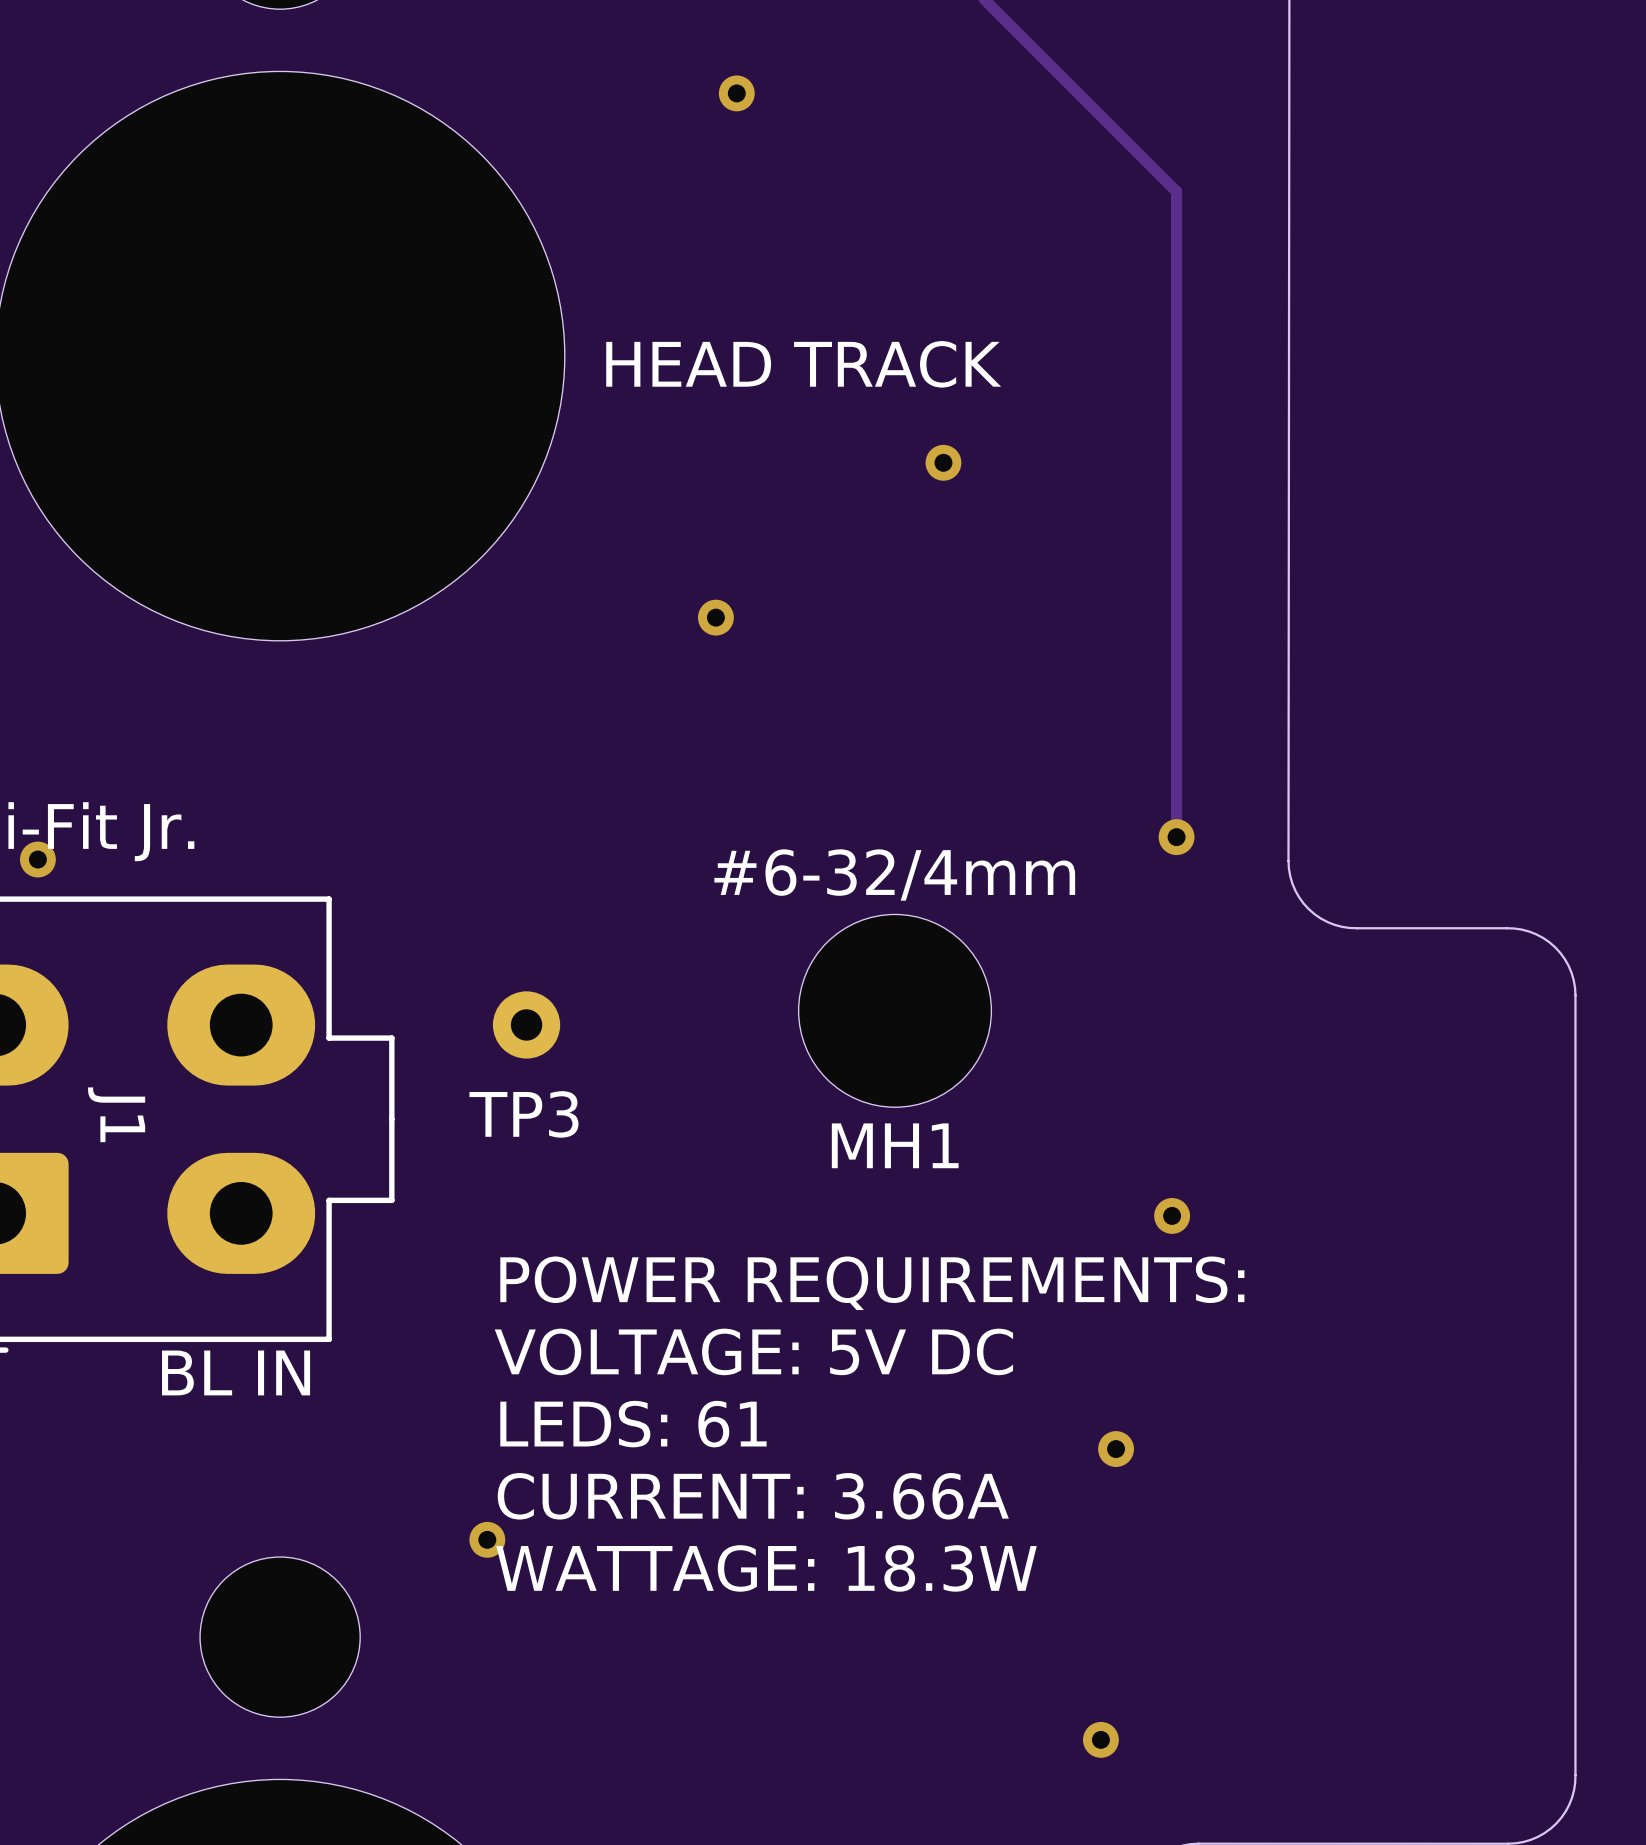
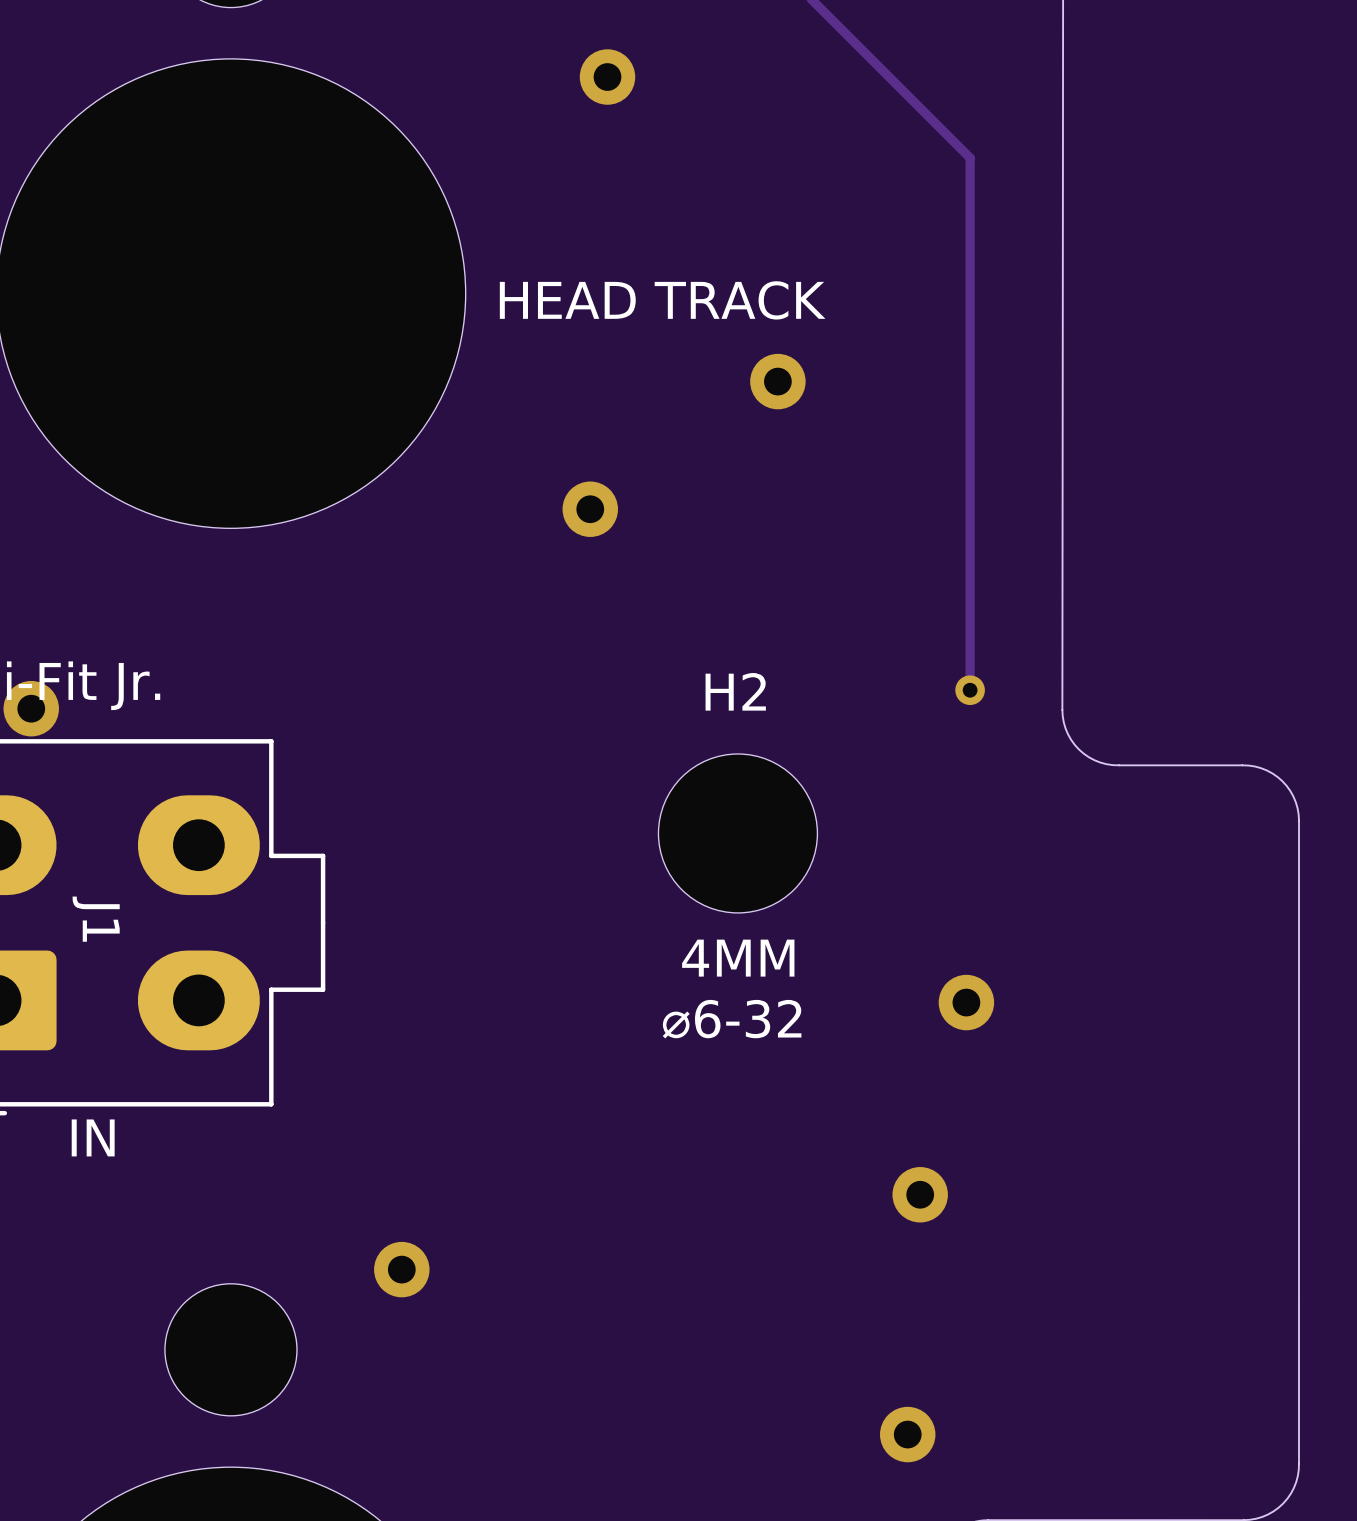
via size: [718, 75, 755, 112] -> [579, 49, 636, 105]
via size: [925, 444, 962, 481] -> [750, 353, 806, 410]
via size: [697, 599, 734, 636] -> [562, 481, 618, 537]
via size: [19, 841, 56, 878] -> [3, 680, 59, 737]
MH1 side: bottom (895, 1010) -> top (737, 833)
part: (526, 1024) -> none
via size: [1154, 1198, 1191, 1234] -> [938, 974, 995, 1031]
text: POWER REQUIREMENTS: (872, 1283) -> none
text: VOLTAGE: 5V DC (753, 1351) -> none
J1 text: BL IN (236, 1372) -> none
text: none -> IN (93, 1137)
text: LEDS: 61 (633, 1424) -> none
via size: [1098, 1431, 1134, 1467] -> [892, 1167, 948, 1223]
text: CURRENT: 3.66A (753, 1496) -> none
via size: [469, 1521, 506, 1558] -> [374, 1241, 430, 1298]
text: WATTAGE: 18.3W (766, 1568) -> none
via size: [1082, 1721, 1119, 1758] -> [880, 1406, 936, 1463]

